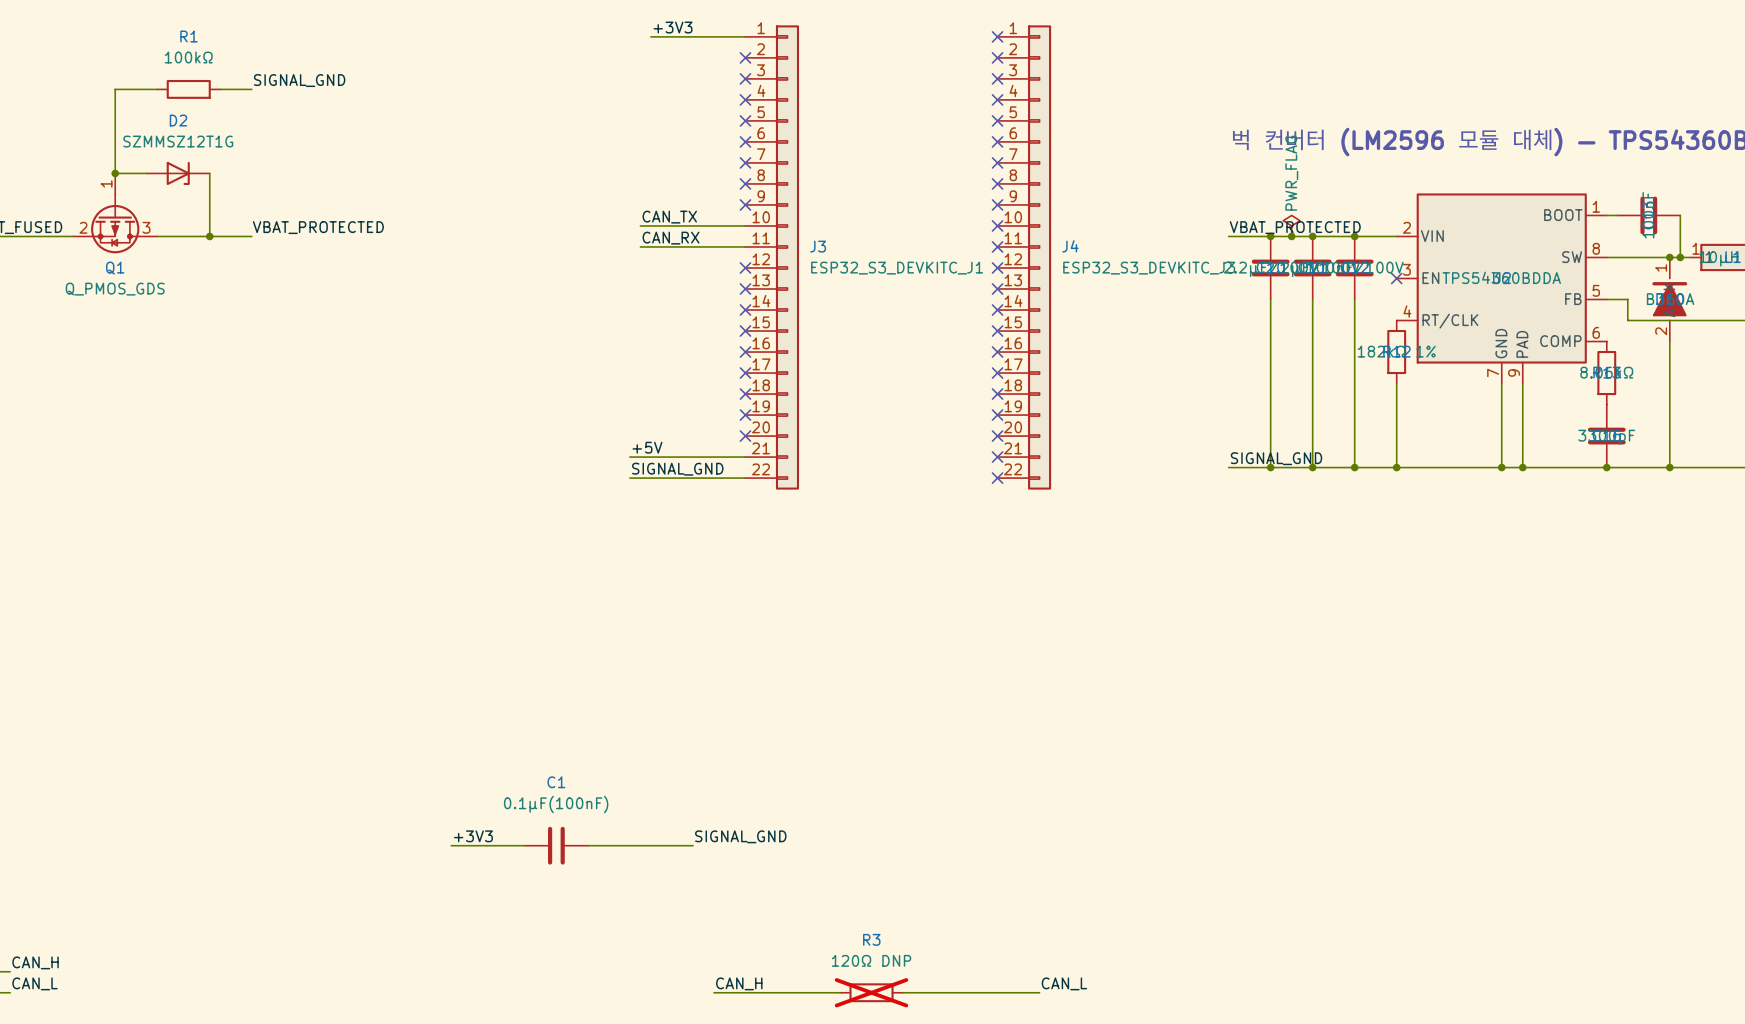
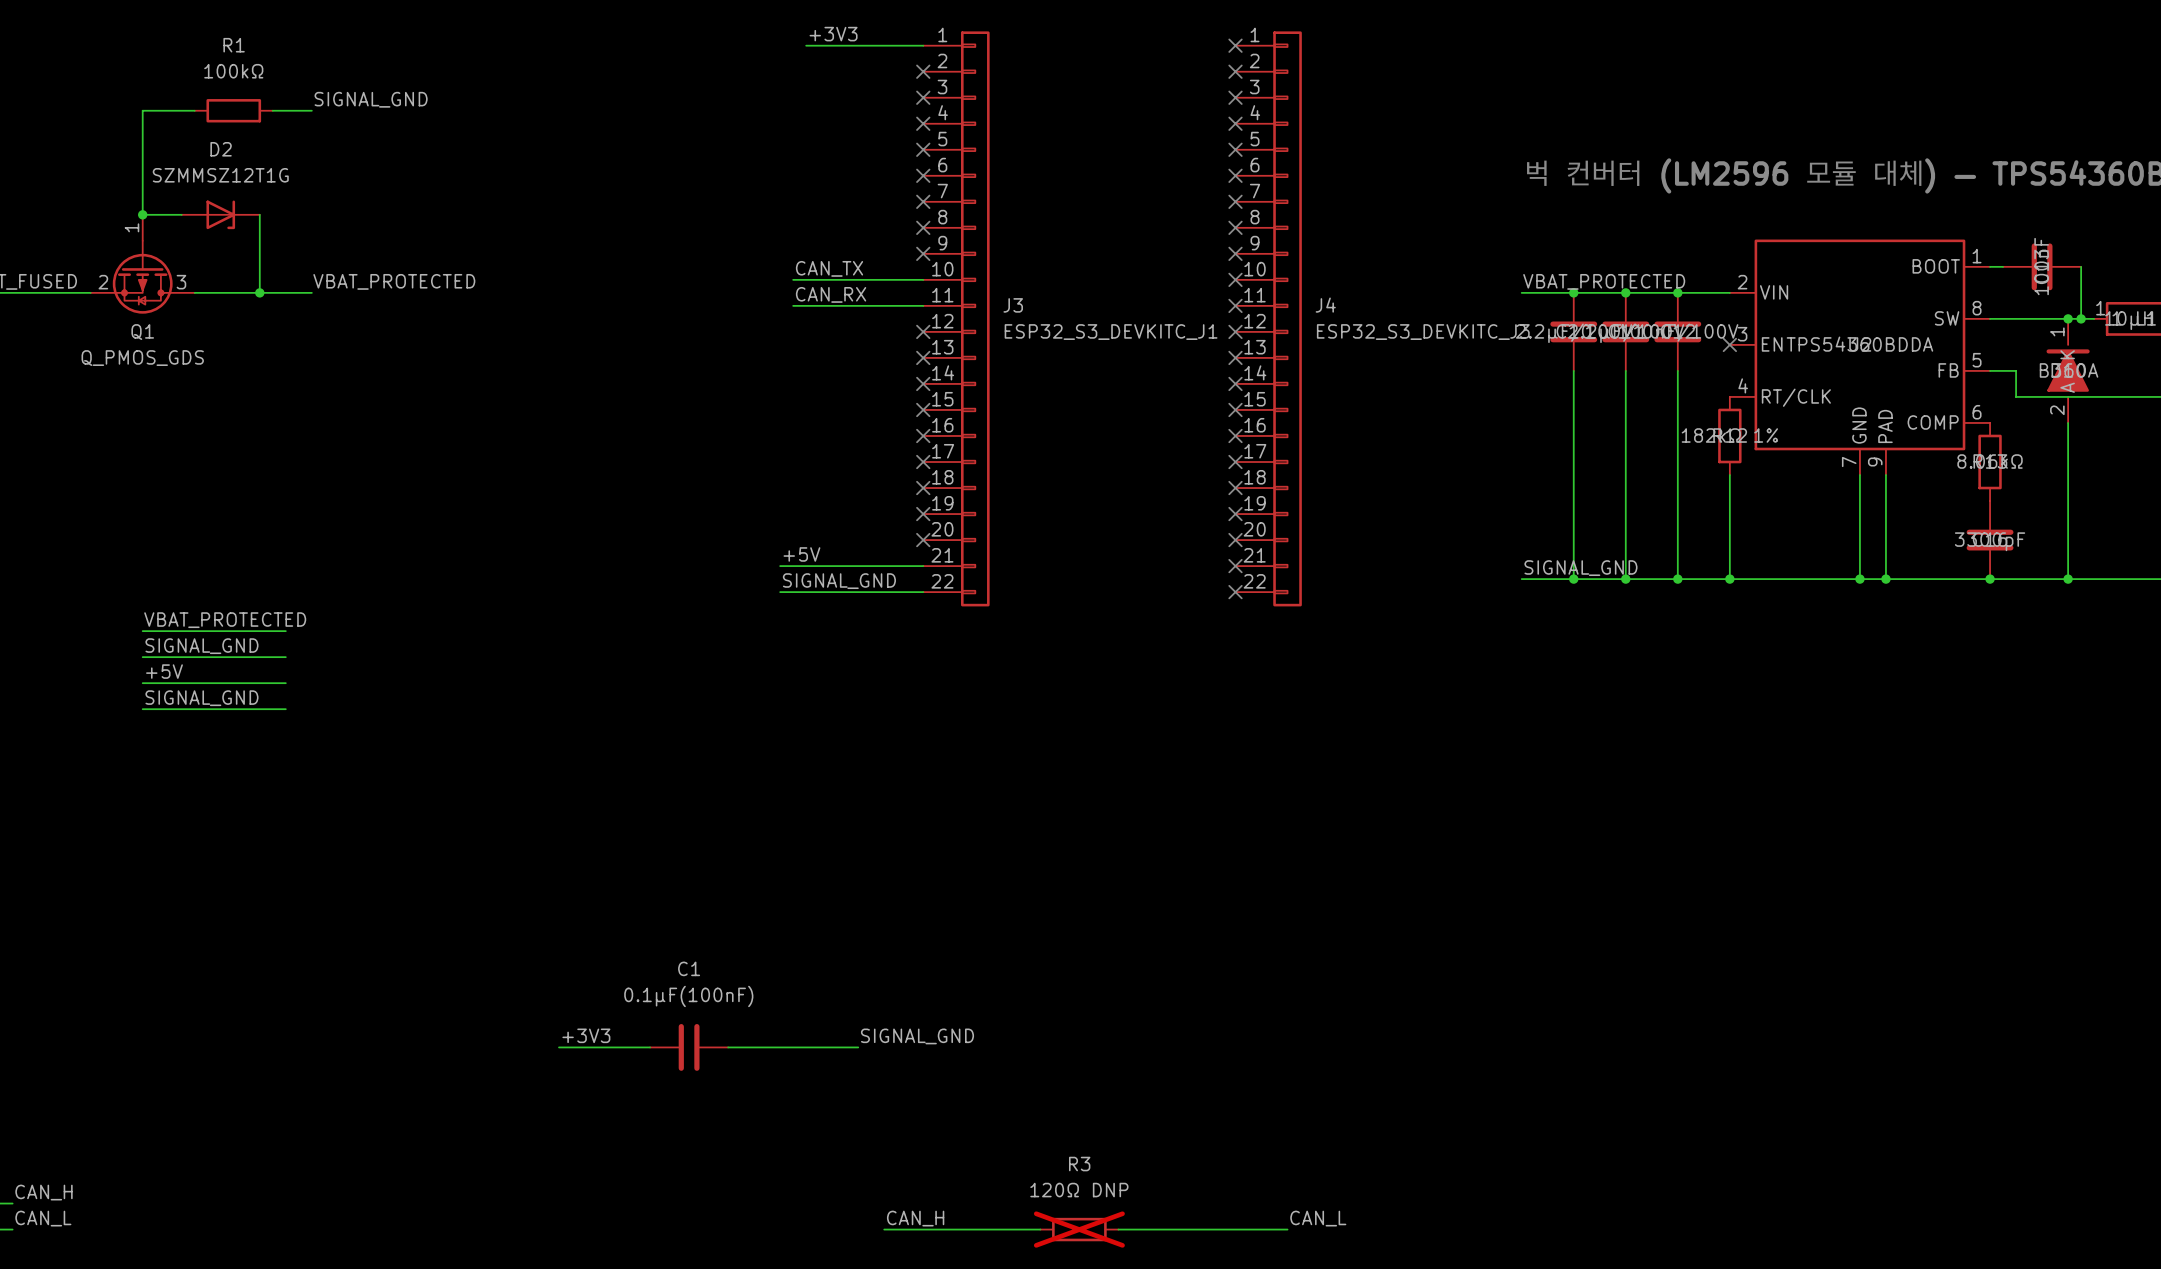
power symbol: PWR_FLAG (1291, 225) -> none
junction: (1291, 236) -> none
label: none -> VBAT_PROTECTED (225, 620)
wire: none -> (142, 631) (285, 631)
label: none -> SIGNAL_GND (201, 646)
wire: none -> (142, 657) (285, 657)
label: none -> +5V (164, 671)
wire: none -> (142, 683) (285, 683)
label: none -> SIGNAL_GND (201, 698)
wire: none -> (142, 709) (285, 709)

